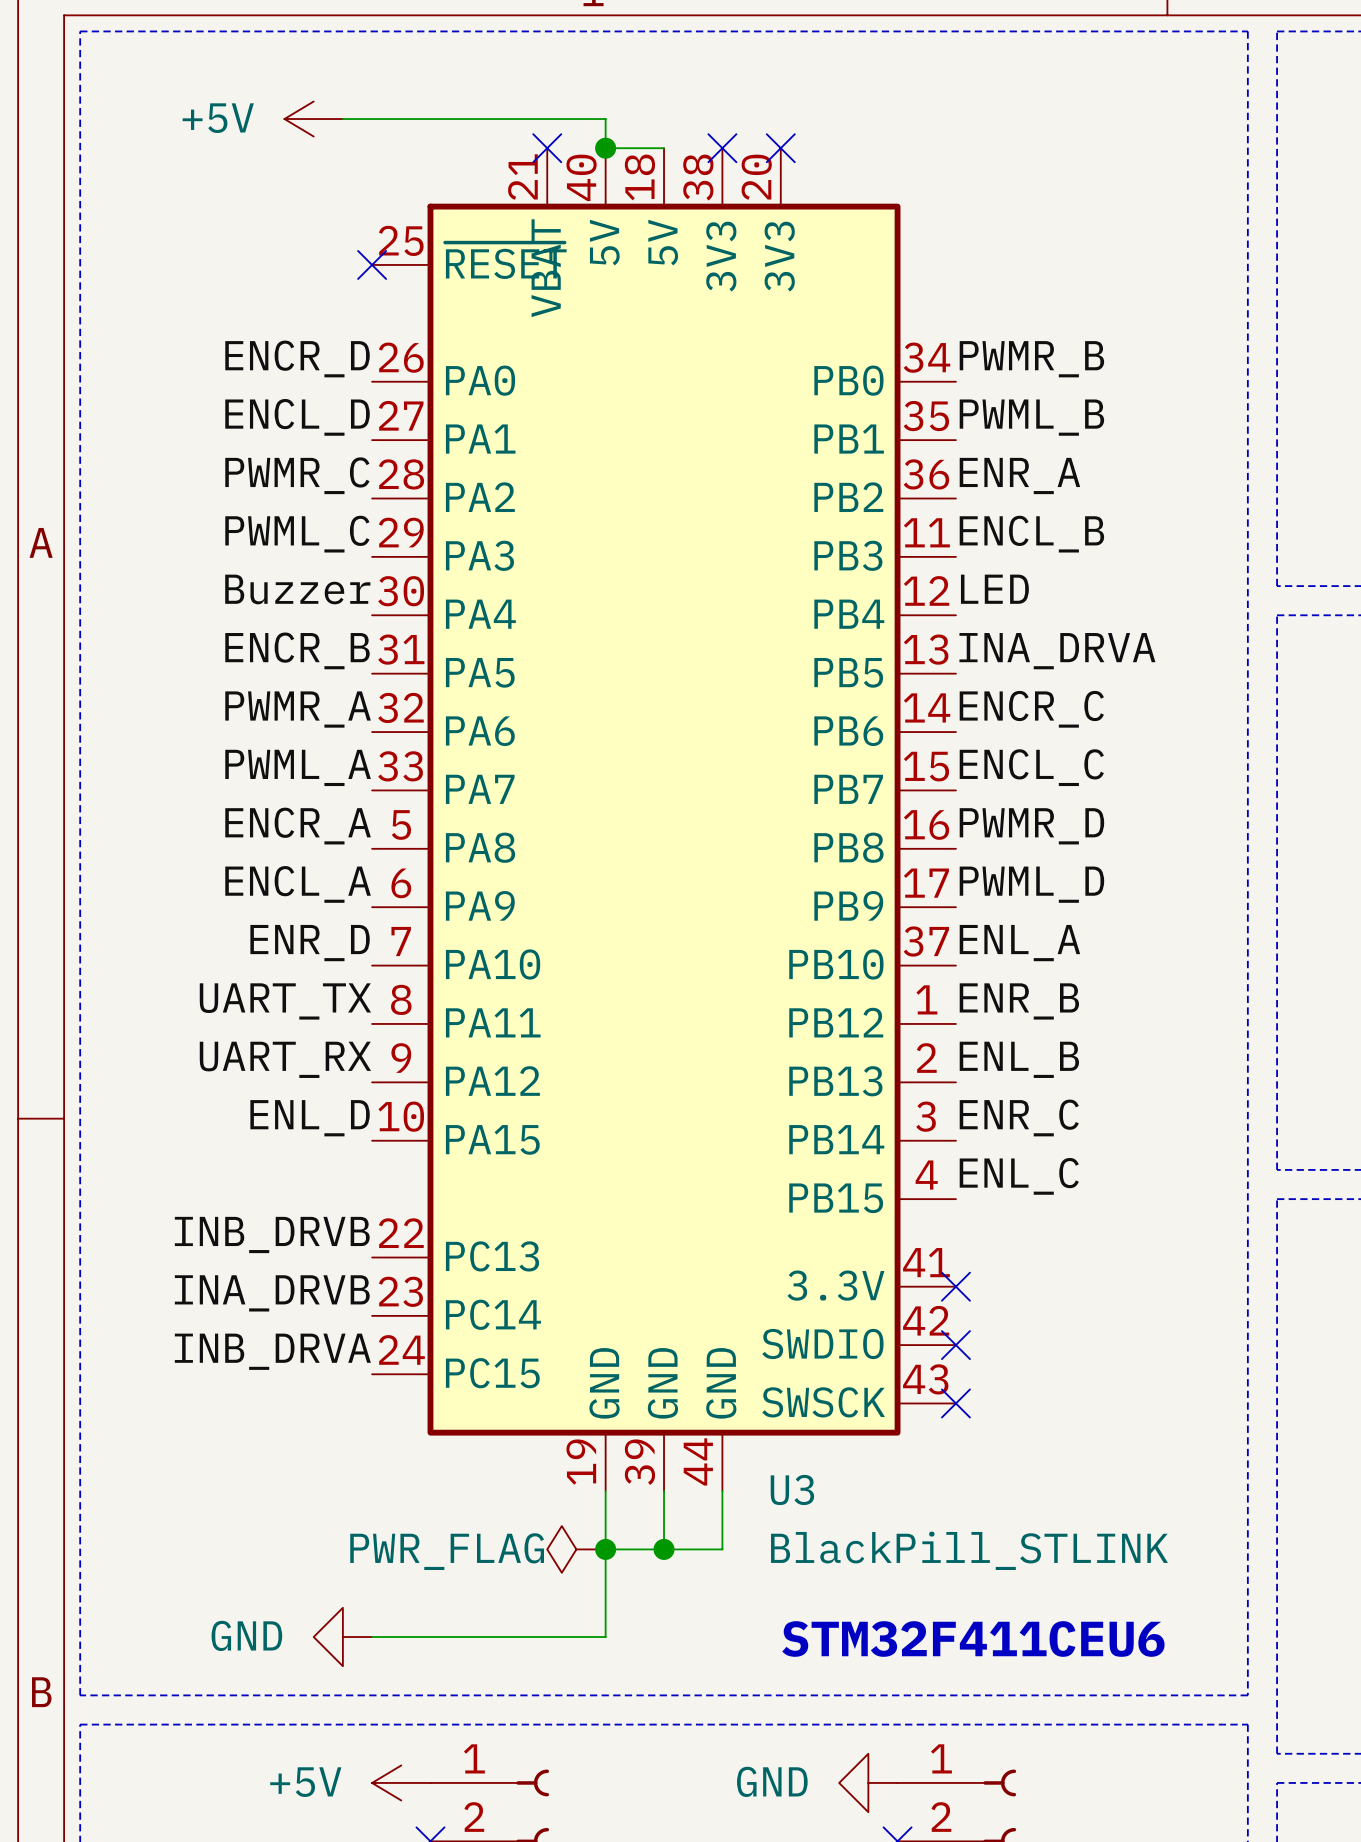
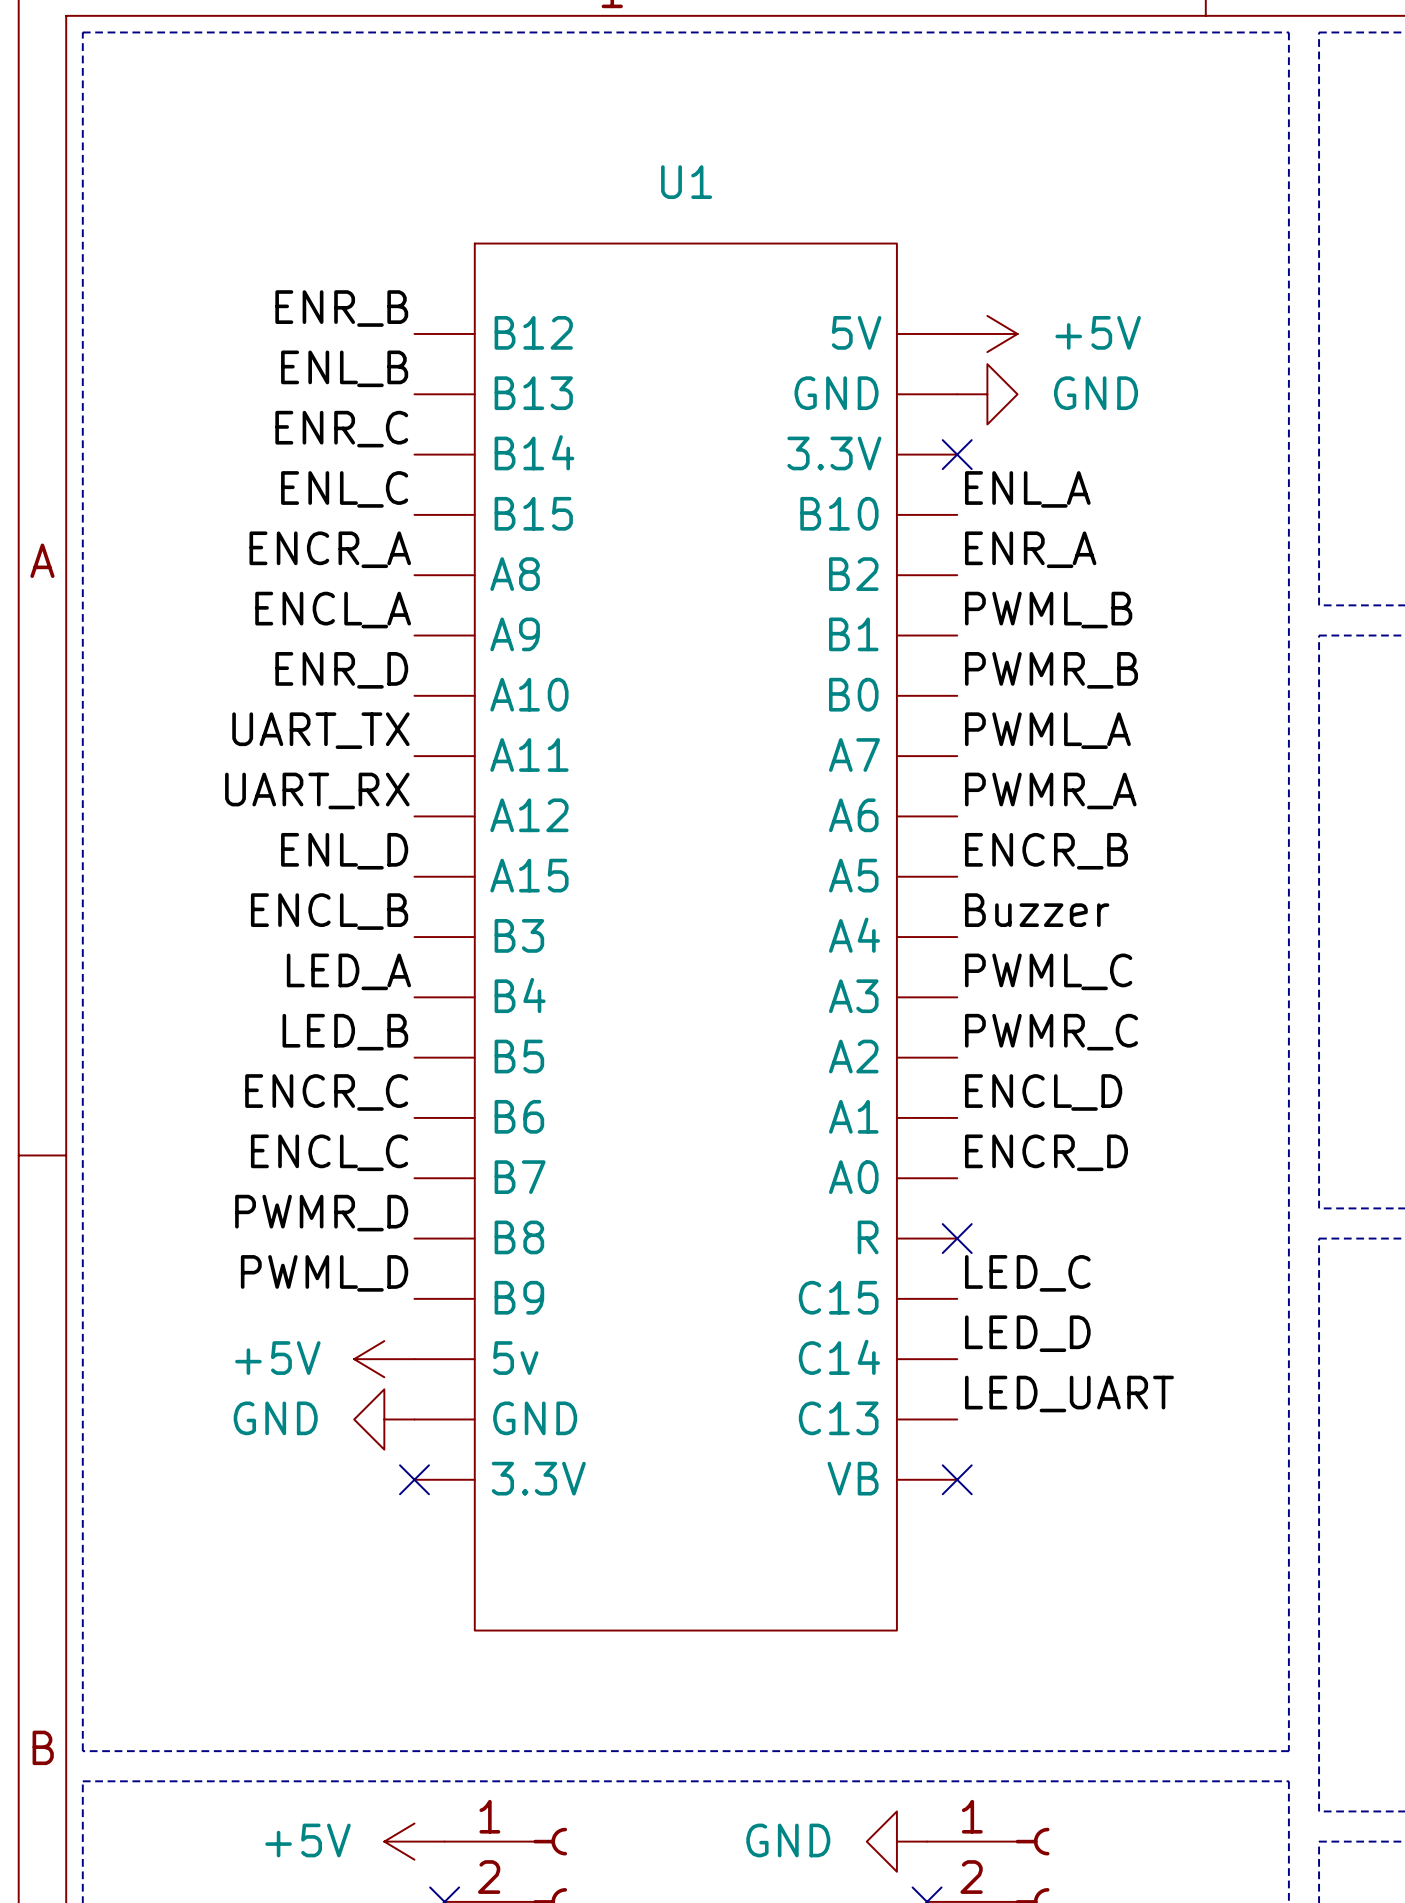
power symbol: +5V (313, 119) -> none
wire: (342, 119) (605, 119) (605, 148) (664, 148) -> none
no-connect mark: (547, 148) -> none
junction: (605, 148) -> none
no-connect mark: (722, 148) -> none
no-connect mark: (780, 148) -> none
no-connect mark: (372, 264) -> none
label: none -> ENR_B (341, 308)
power symbol: none -> +5V (987, 333)
label: ENCR_D (297, 358) -> none
label: none -> ENL_B (344, 368)
label position: PWMR_B (1031, 359) -> PWMR_B (1051, 670)
power symbol: none -> GND (987, 394)
label: ENCL_D (297, 417) -> none
label: none -> ENR_C (341, 429)
label position: PWML_B (1031, 417) -> PWML_B (1048, 610)
no-connect mark: none -> (957, 454)
label: PWMR_C (297, 475) -> none
label: none -> ENL_C (344, 489)
label position: ENR_A (1019, 475) -> ENR_A (1030, 549)
label: PWML_C (297, 534) -> none
label: ENCL_B (1031, 534) -> none
label: Buzzer (297, 589) -> none
label: LED (994, 589) -> none
label: ENCR_B (297, 650) -> none
label: INA_DRVA (1057, 651) -> none
label position: PWMR_A (298, 709) -> PWMR_A (1050, 790)
label: ENCR_C (1031, 709) -> none
label position: PWML_A (298, 767) -> PWML_A (1047, 730)
label: ENCL_C (1031, 767) -> ENCR_B (1046, 851)
U3: BlackPill_STLINK (664, 819) -> none
label position: ENCR_A (298, 826) -> ENCR_A (330, 549)
label: PWMR_D (1031, 826) -> none
label: none -> Buzzer (1037, 910)
label position: ENCL_A (298, 884) -> ENCL_A (333, 610)
label: none -> ENCL_B (329, 911)
label: PWML_D (1031, 884) -> PWML_C (1048, 971)
U1: none -> (685, 937)
label position: ENR_D (310, 943) -> ENR_D (341, 670)
label: none -> LED_A (348, 971)
label position: ENL_A (1019, 943) -> ENL_A (1027, 489)
label position: UART_TX (285, 1001) -> UART_TX (320, 730)
label: none -> LED_B (345, 1032)
label: none -> PWMR_C (1051, 1032)
label: ENR_B (1019, 1001) -> none
label position: UART_RX (285, 1059) -> UART_RX (317, 790)
label: none -> ENCR_C (326, 1092)
label: ENL_B (1019, 1059) -> ENCL_D (1043, 1092)
label: none -> ENCL_C (329, 1152)
label: ENR_C (1019, 1117) -> ENCR_D (1046, 1152)
label position: ENL_D (310, 1118) -> ENL_D (344, 851)
label: none -> PWMR_D (321, 1213)
label: ENL_C (1019, 1176) -> none
no-connect mark: none -> (957, 1238)
label: INB_DRVB (272, 1234) -> none
label: none -> PWML_D (324, 1273)
label: none -> LED_C (1027, 1273)
no-connect mark: (955, 1286) -> none
label: INA_DRVB (272, 1293) -> none
label: none -> LED_D (1027, 1333)
power symbol: none -> +5V (384, 1359)
no-connect mark: (955, 1345) -> none
label: INB_DRVA (272, 1351) -> none
label: none -> LED_UART (1069, 1394)
no-connect mark position: (955, 1403) -> (957, 1479)
no-connect mark: none -> (414, 1479)
wire: (605, 1491) (605, 1637) (372, 1637) -> none
wire: (664, 1491) (664, 1549) -> none
wire: (722, 1491) (722, 1549) (605, 1549) -> none
power symbol: PWR_FLAG (576, 1549) -> none
junction: (605, 1549) -> none
junction: (664, 1549) -> none
power symbol position: GND (342, 1637) -> GND (384, 1419)
text: STM32F411CEU6 (973, 1638) -> none

